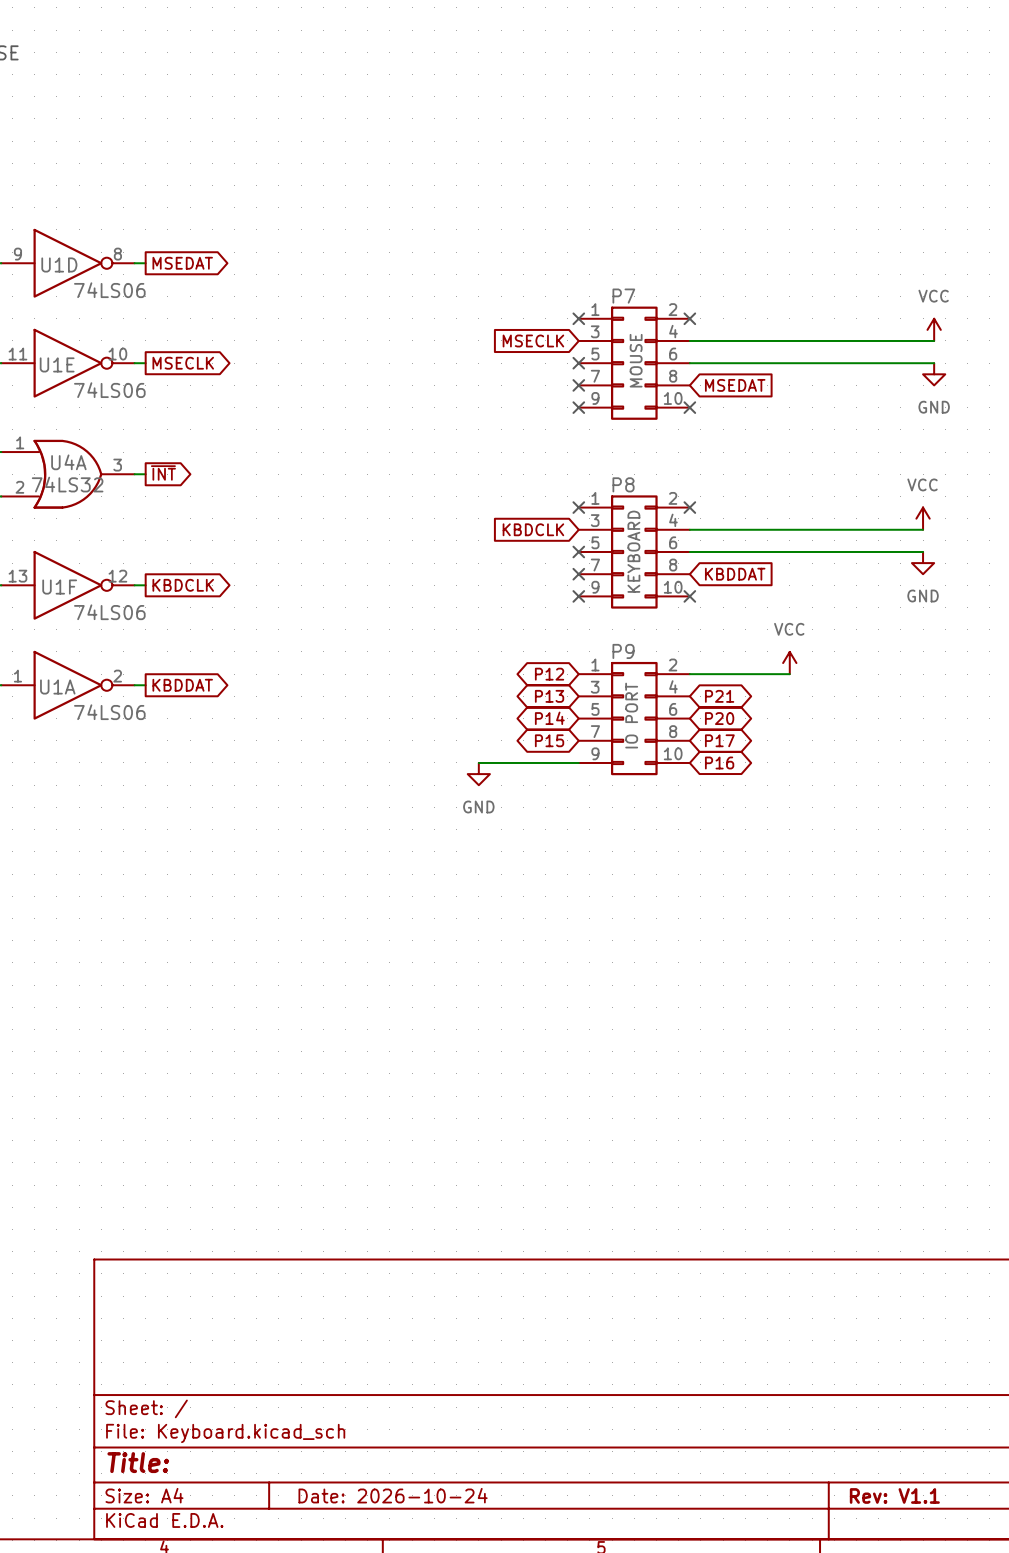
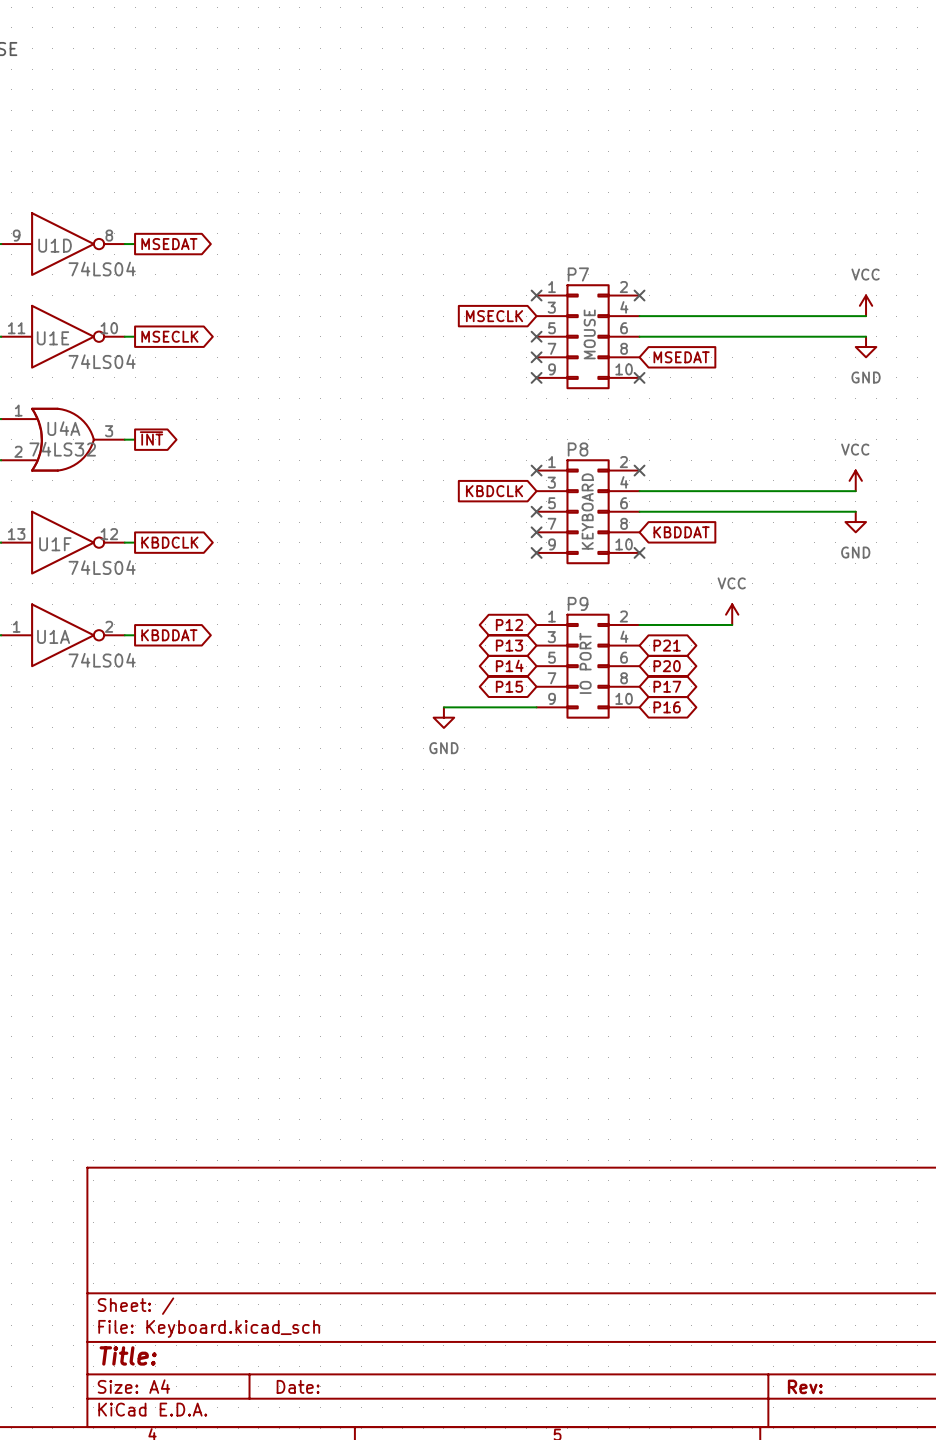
U1D value: 74LS06 (109, 290) -> 74LS04 (102, 269)
U1E value: 74LS06 (109, 390) -> 74LS04 (102, 361)
U1F value: 74LS06 (109, 612) -> 74LS04 (102, 567)
U1A value: 74LS06 (109, 712) -> 74LS04 (102, 660)
title block: Date: 2026-10-24 (393, 1495) -> Date: (298, 1386)
title block: Rev: V1.1 (894, 1495) -> Rev: (805, 1386)

